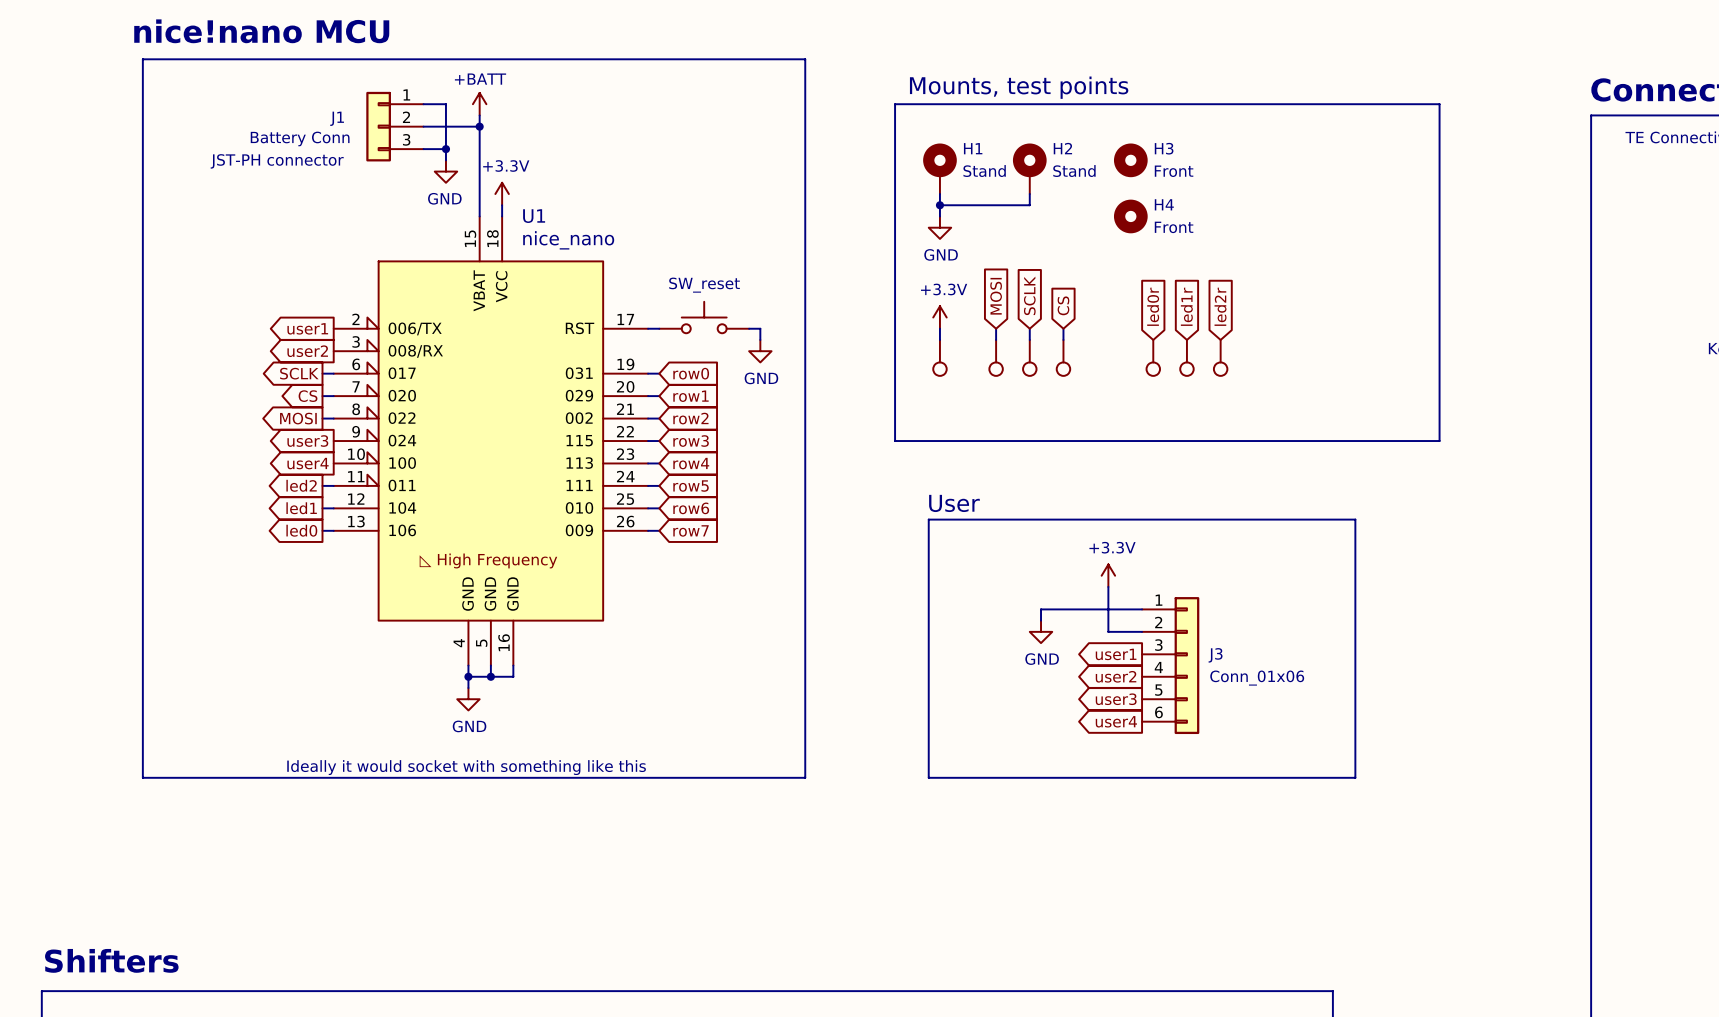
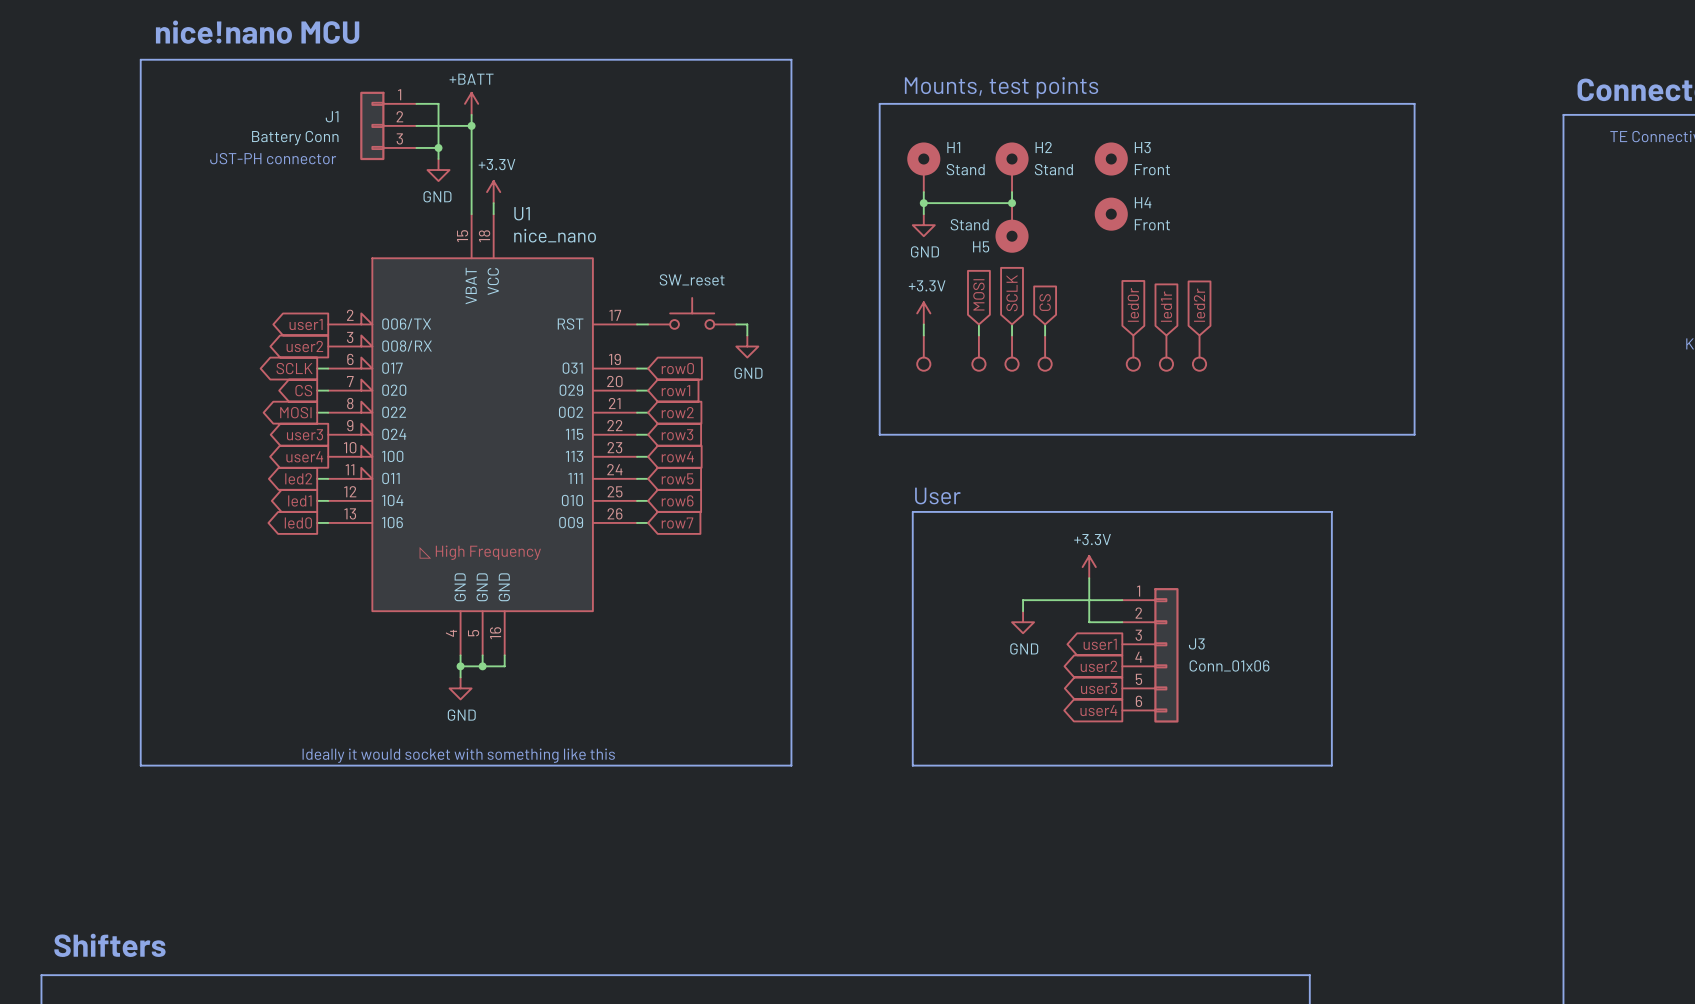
junction: none -> (1012, 203)
H5: none -> Stand (1012, 227)

